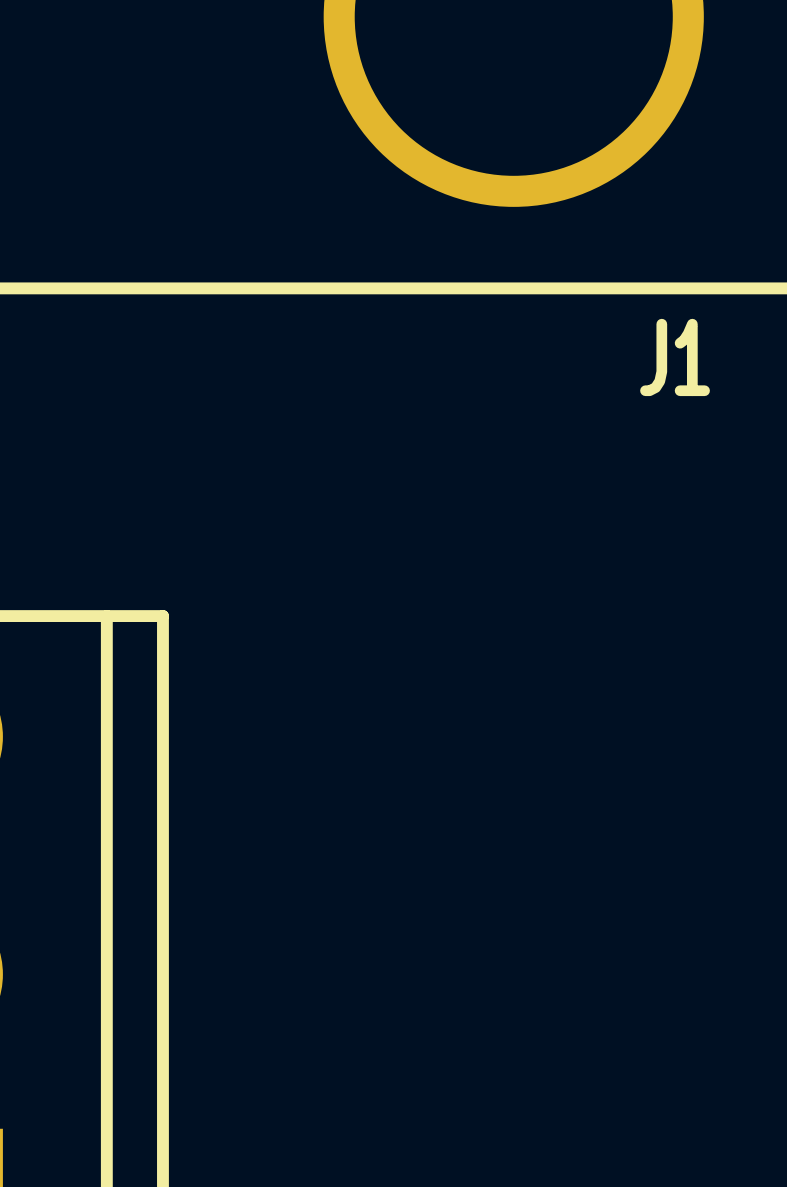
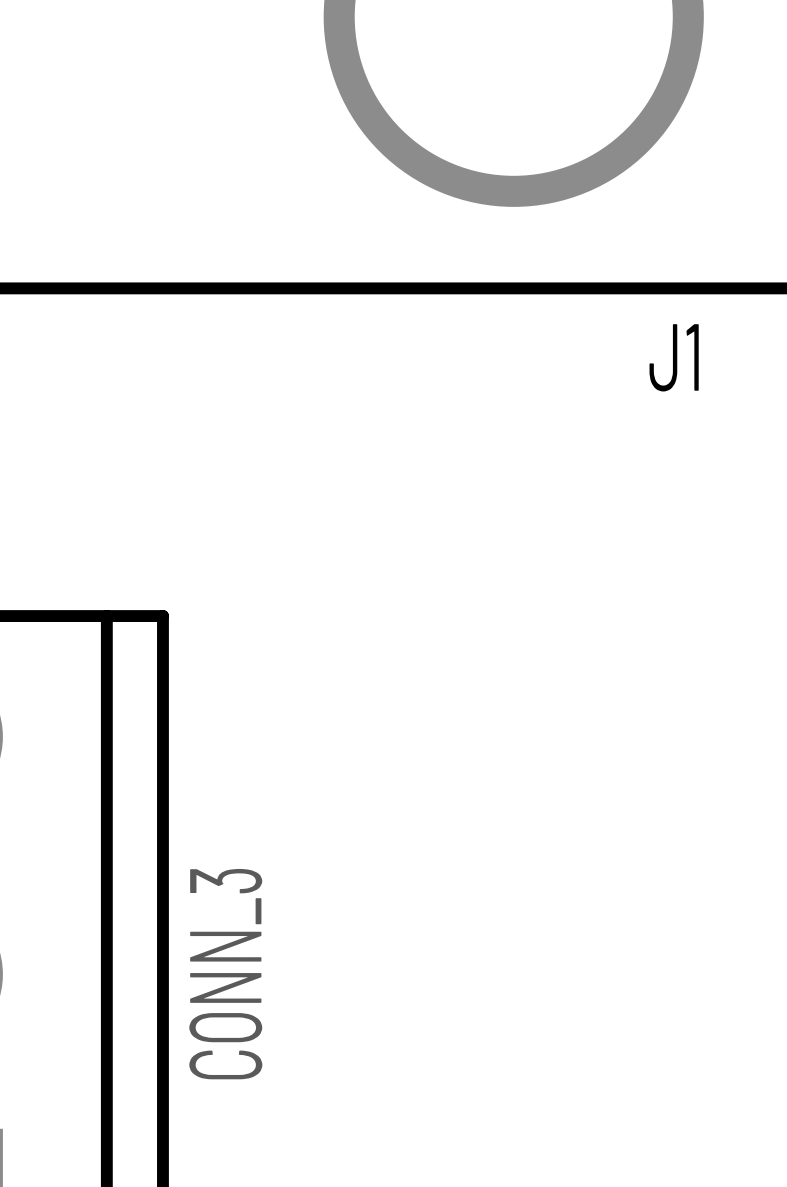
part value: none -> CONN_3 (225, 974)

